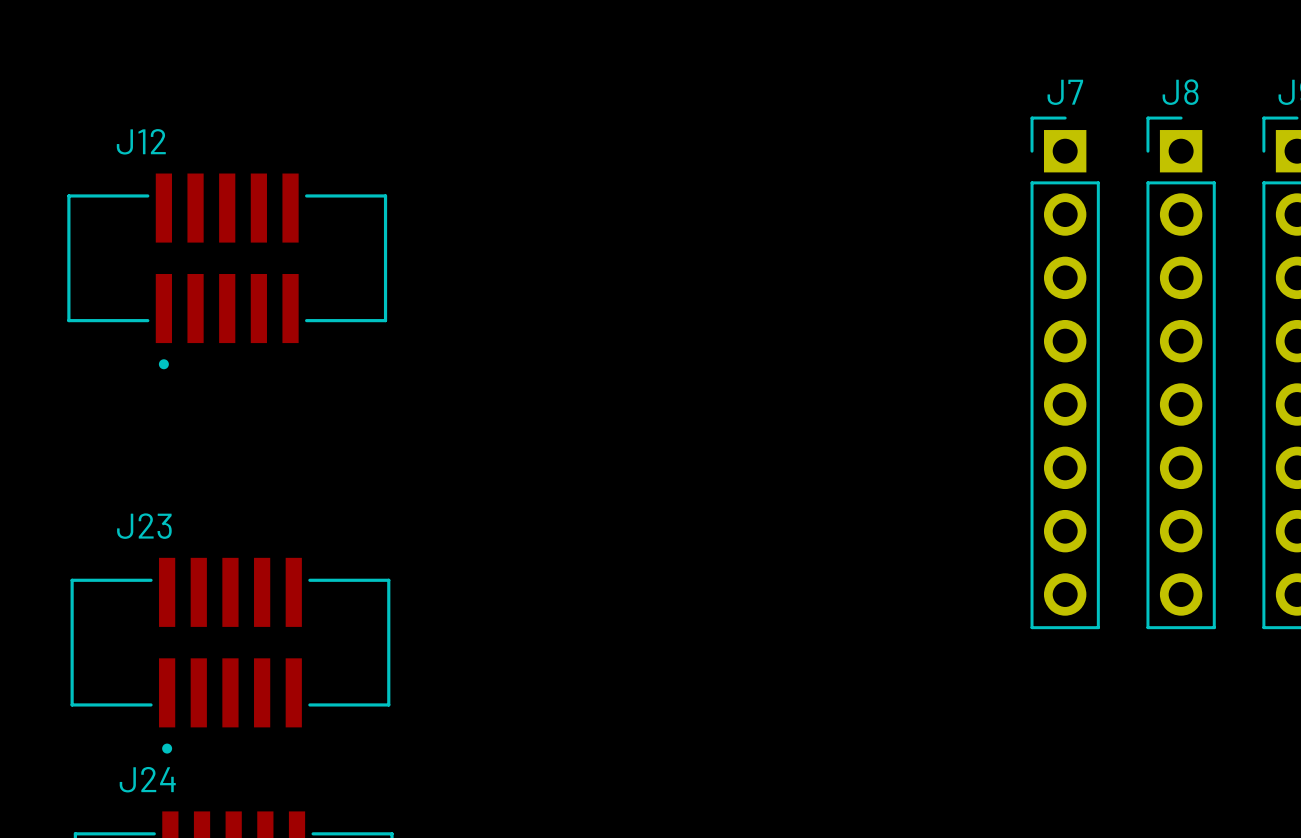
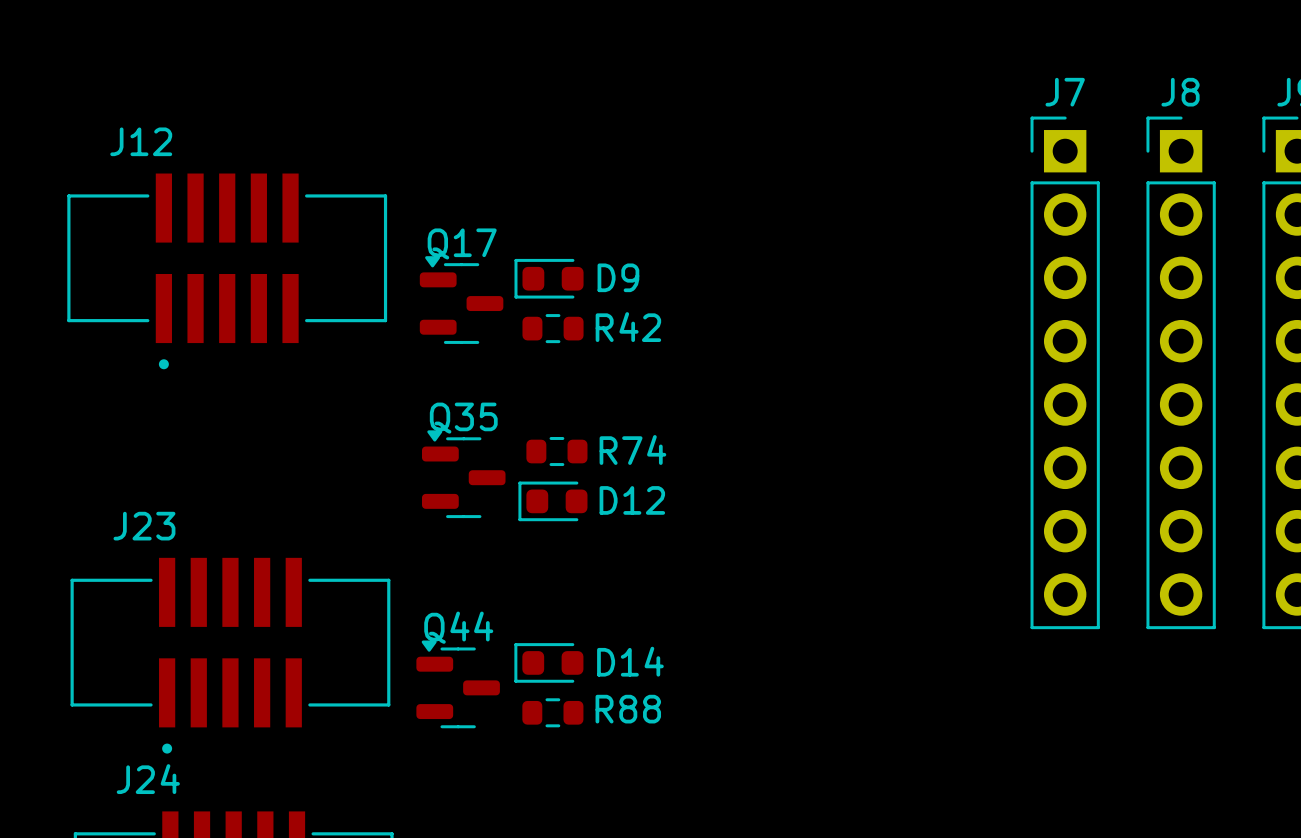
D9: none -> (549, 278)
Q17: none -> (461, 300)
R42: none -> (553, 328)
R74: none -> (556, 451)
Q35: none -> (463, 474)
D12: none -> (552, 501)
D14: none -> (548, 662)
Q44: none -> (458, 684)
R88: none -> (552, 712)

